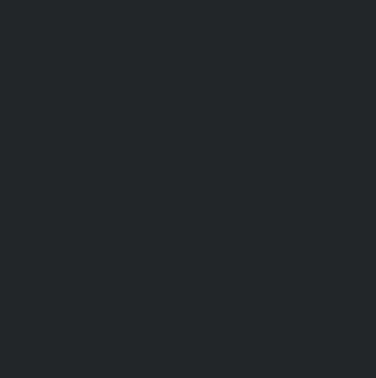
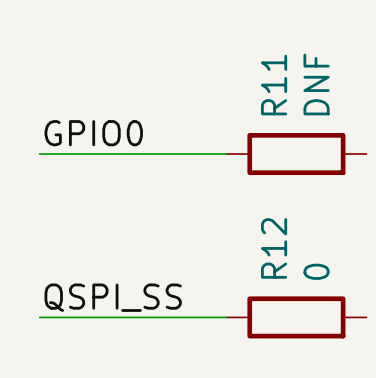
label: none -> GPIO0 (93, 133)
wire: none -> (39, 154) (226, 154)
R11: none -> DNF (296, 154)
label: none -> QSPI_SS (113, 297)
wire: none -> (39, 317) (226, 317)
R12: none -> 0 (296, 317)

